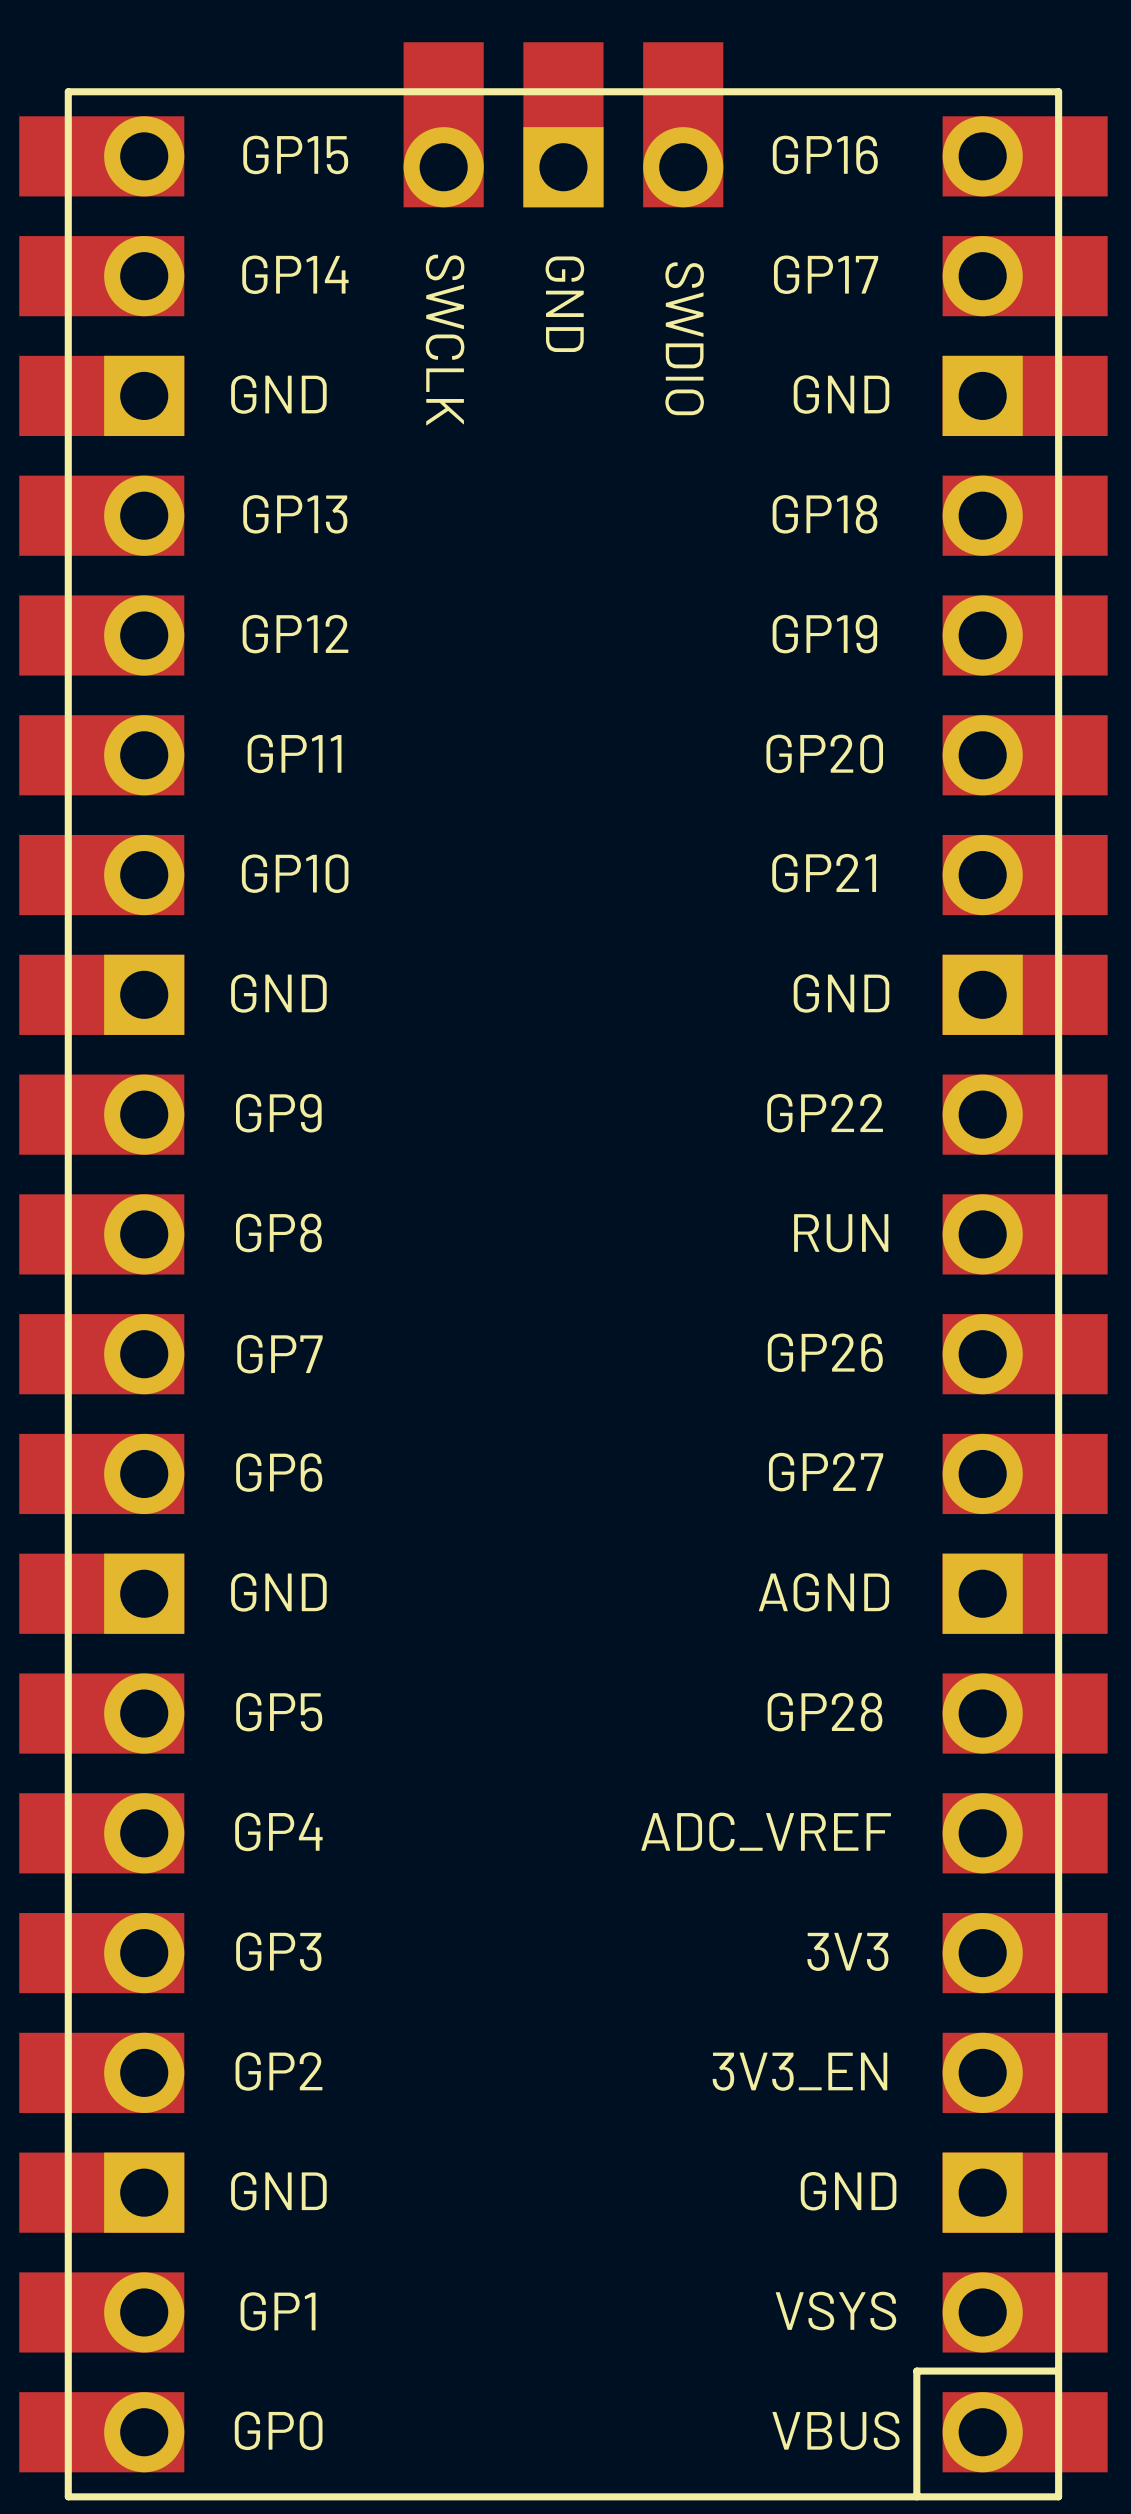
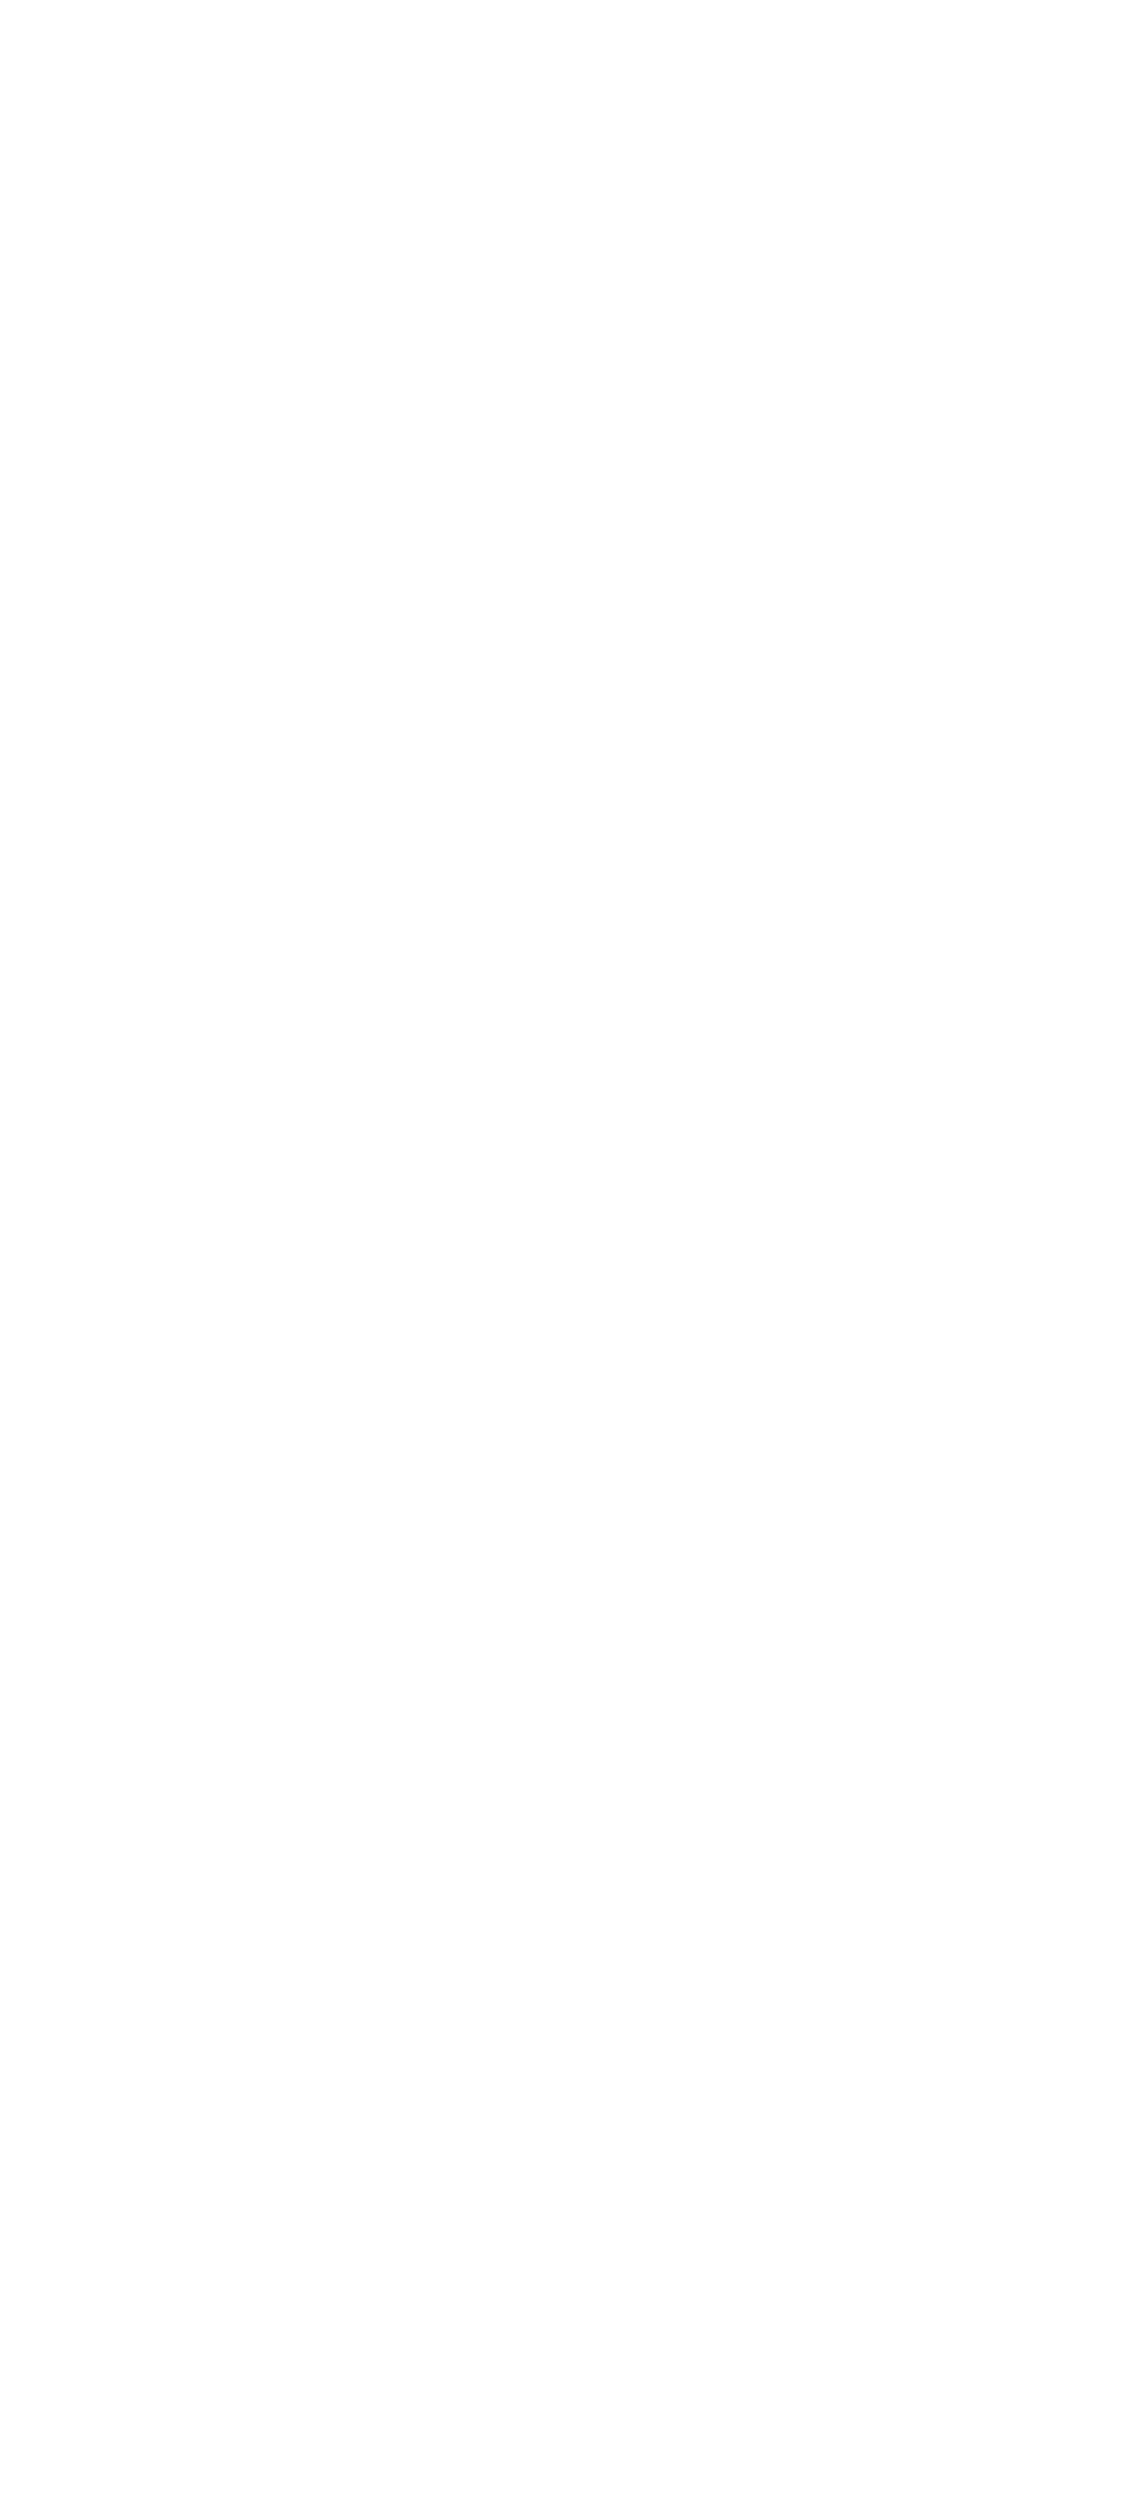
part: (563, 1271) -> none

